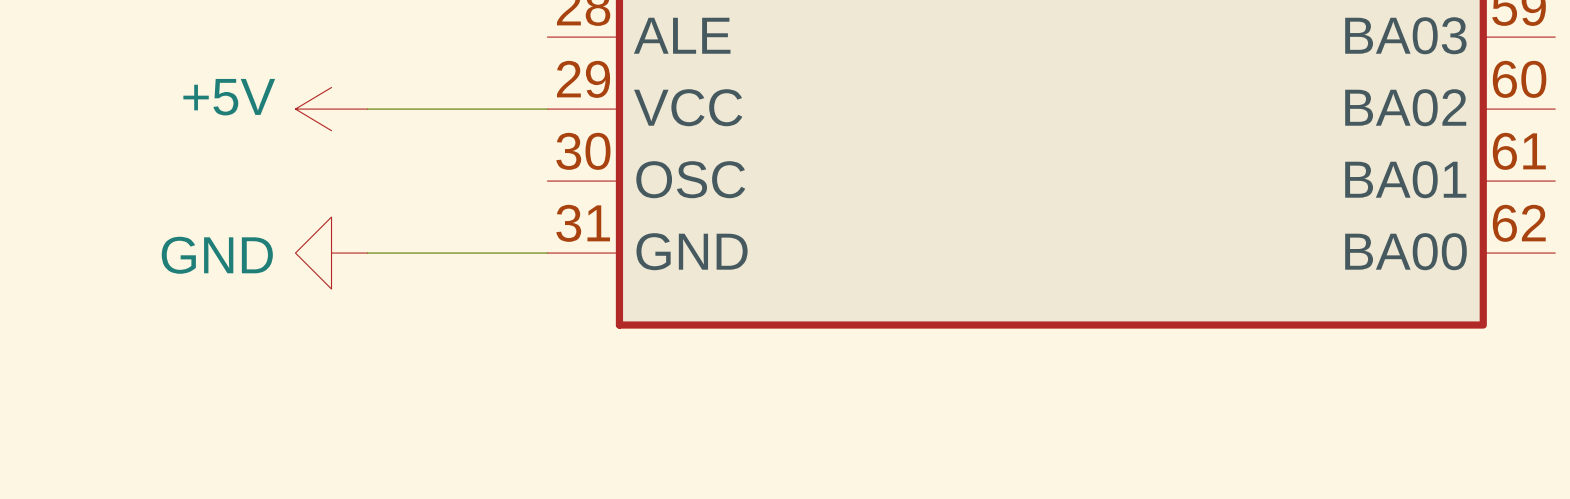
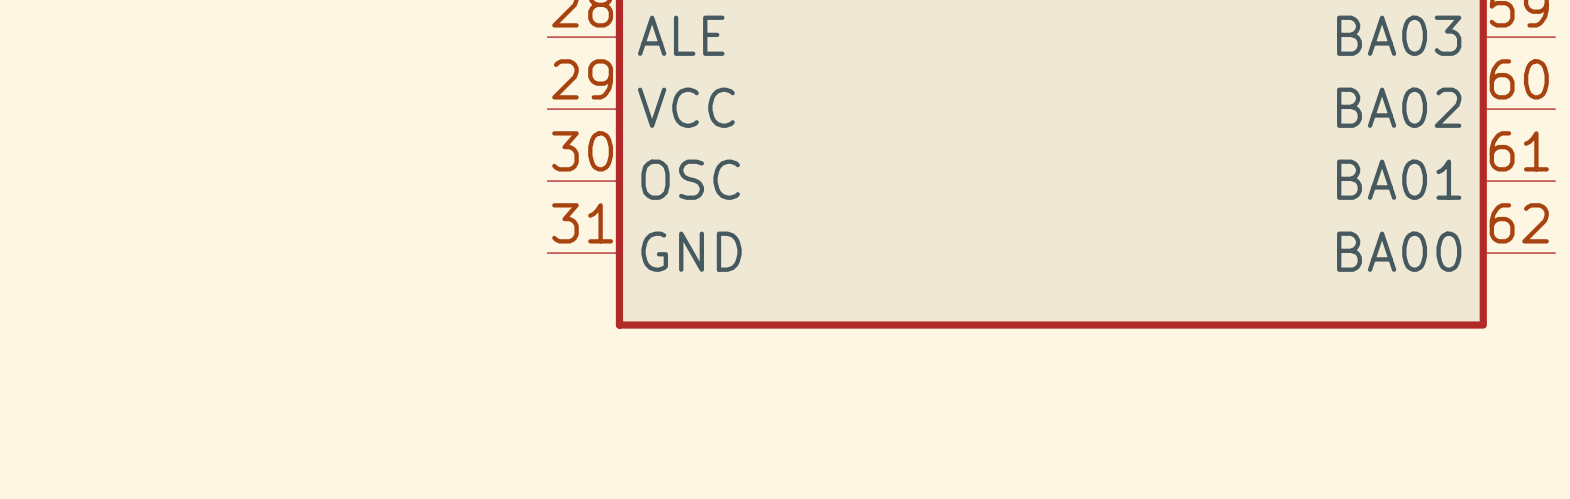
power symbol: +5V (331, 109) -> none
wire: (367, 109) (547, 109) -> none
power symbol: GND (331, 253) -> none
wire: (367, 253) (547, 253) -> none

